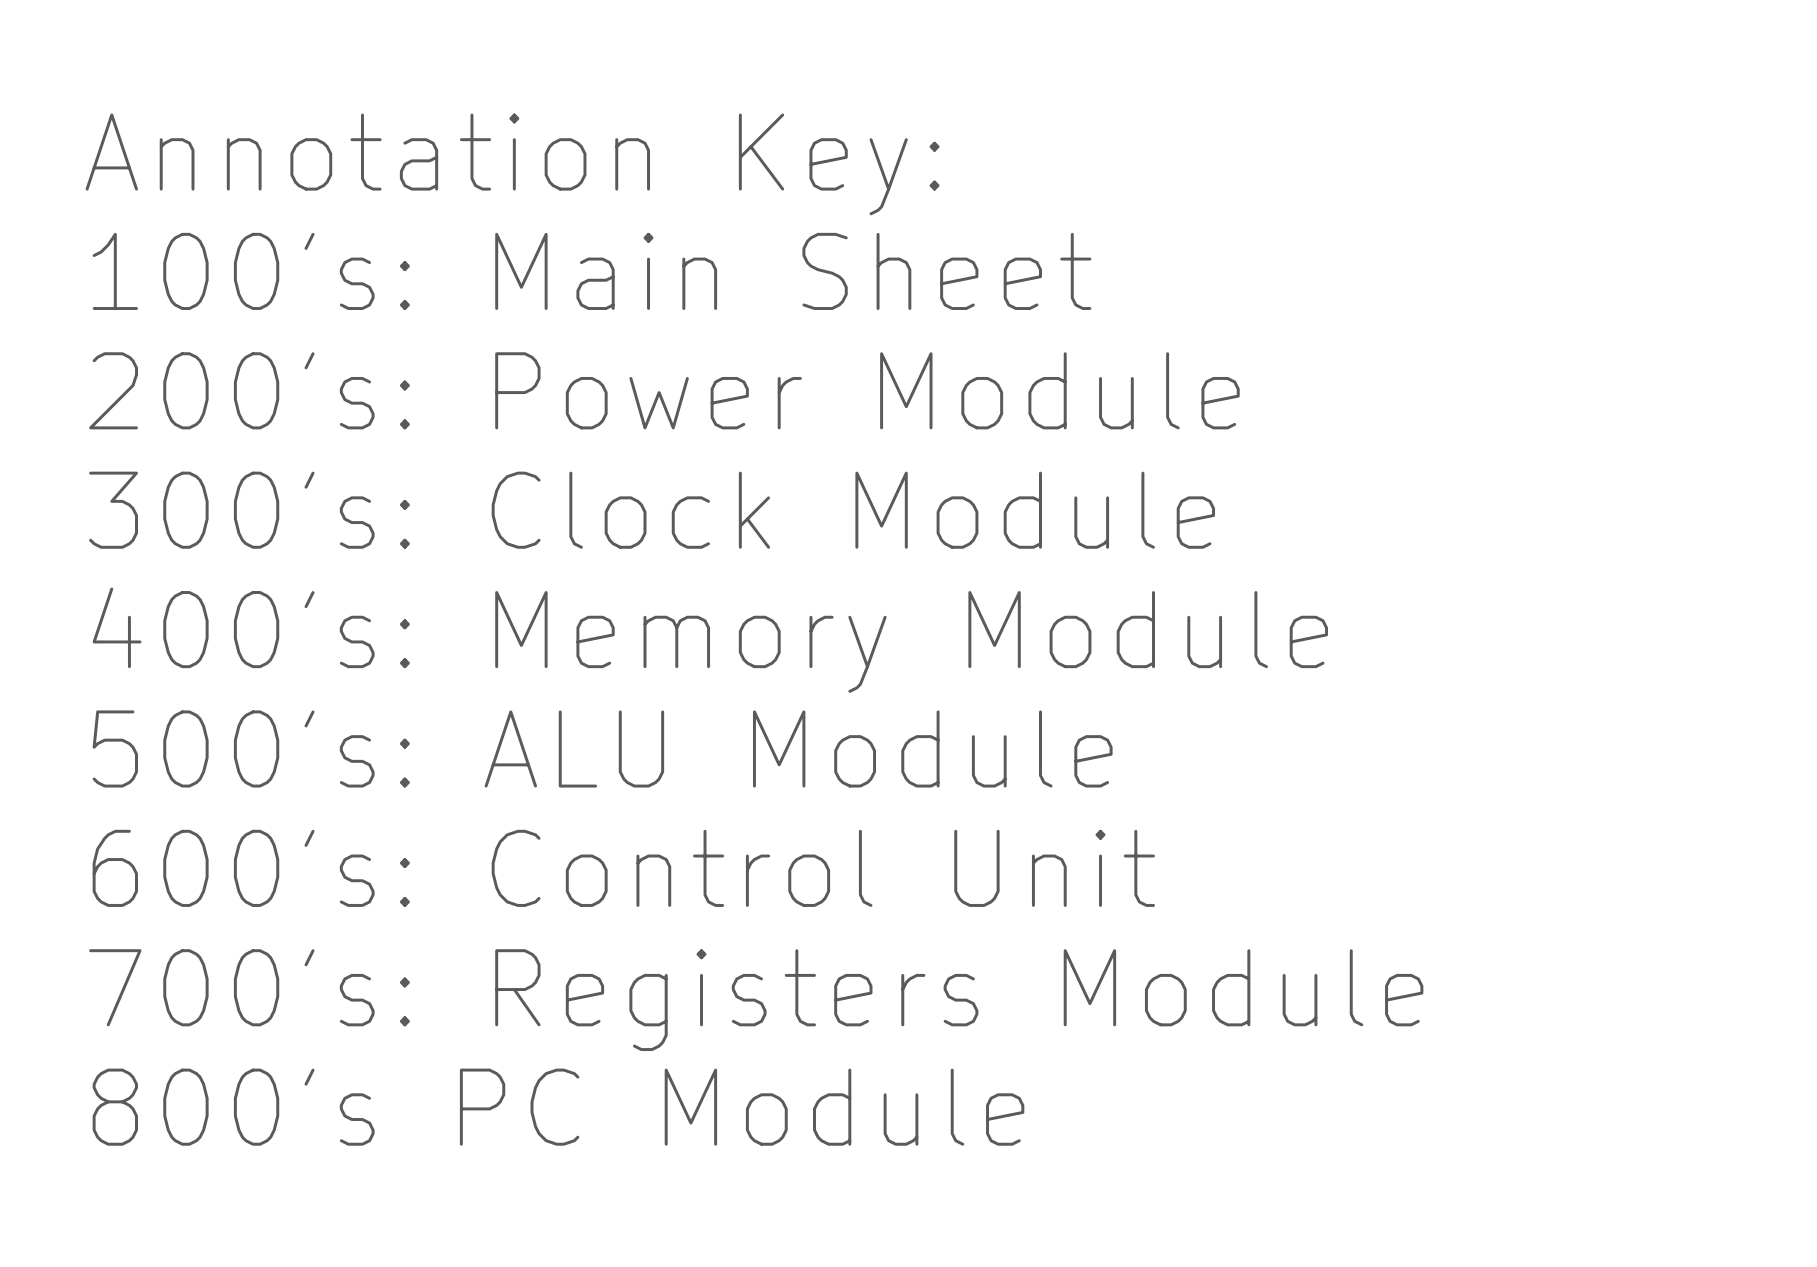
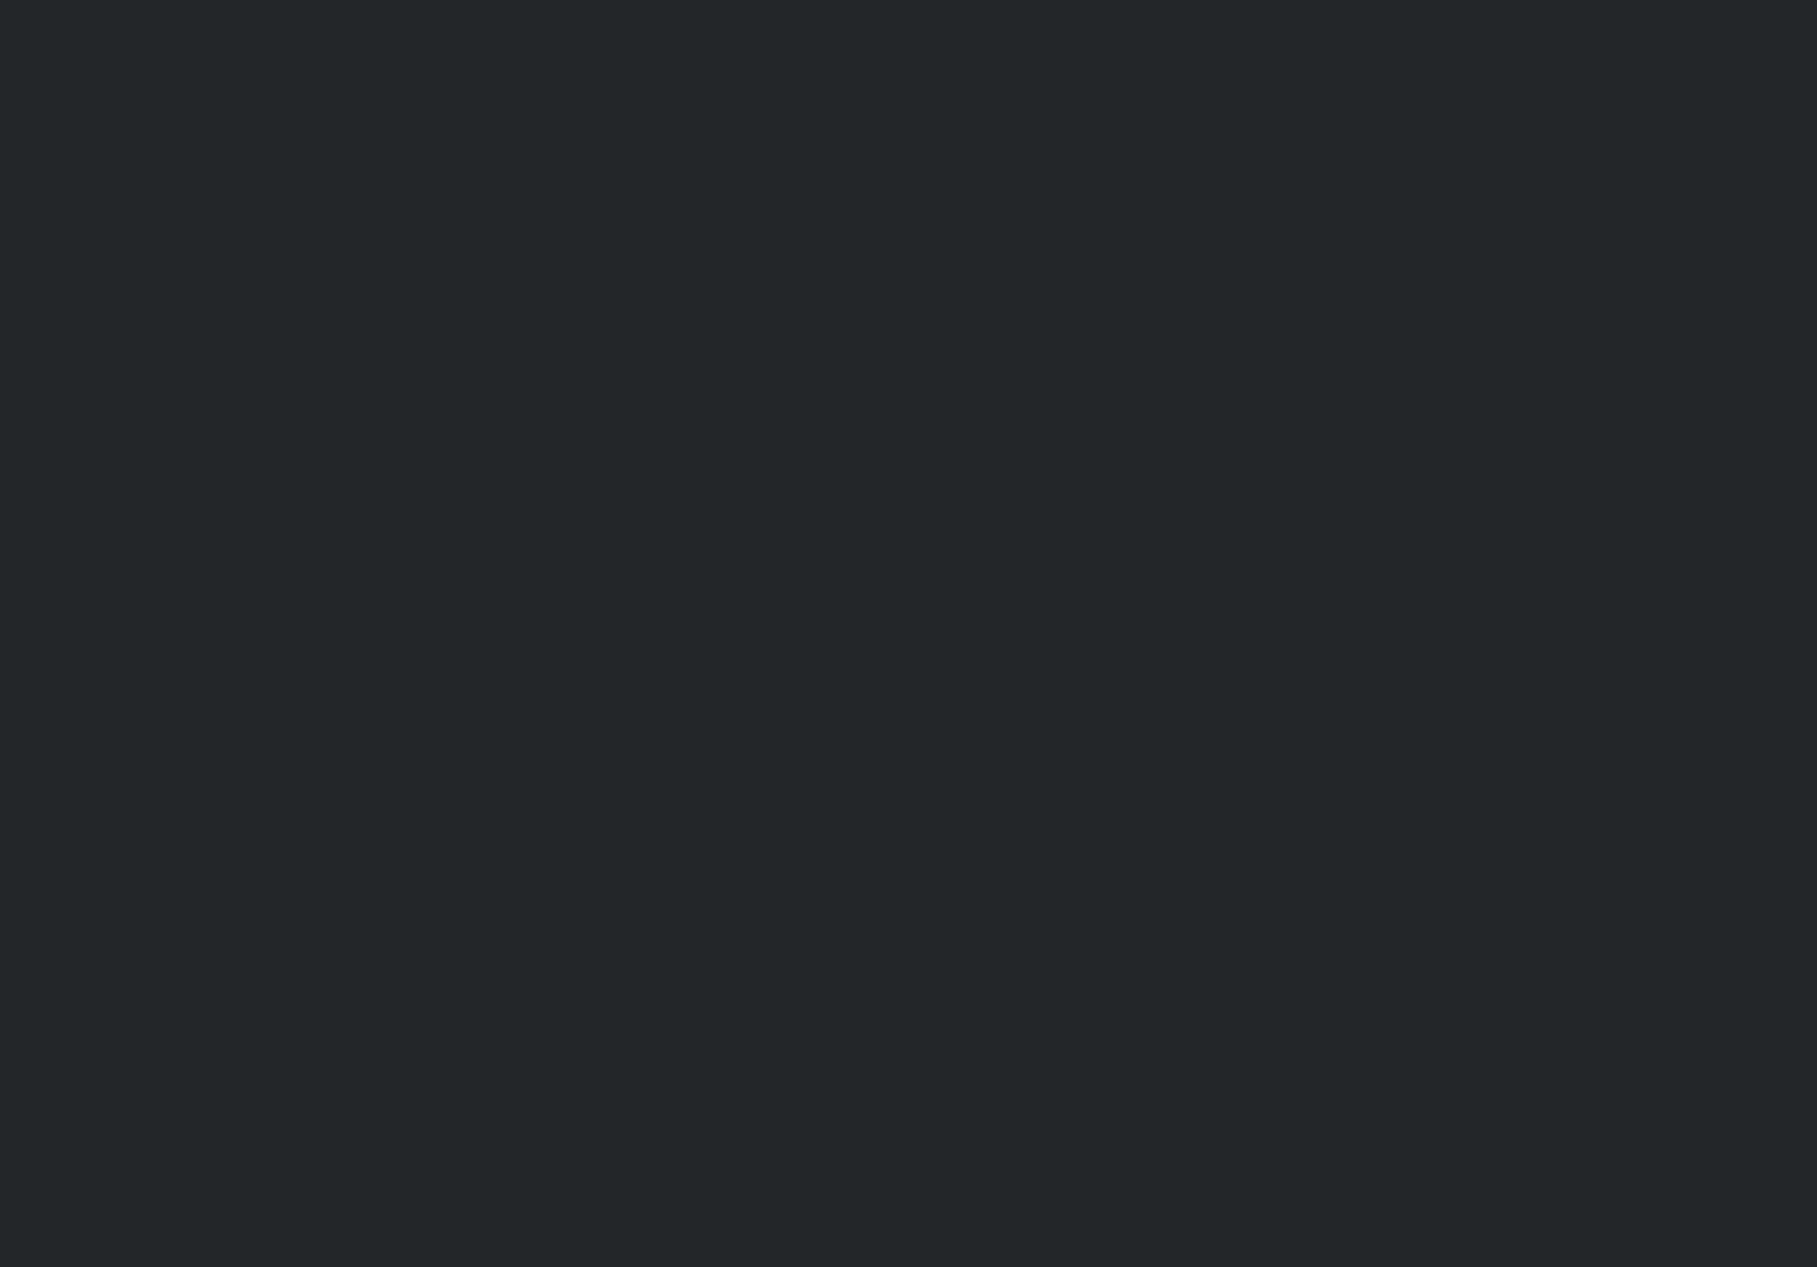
text: Annotation Key: (512, 164) -> none
text: 100's: Main Sheet (592, 271) -> none
text: 200's: Power Module (664, 390) -> none
text: 300's: Clock Module (652, 510) -> none
text: 400's: Memory Module (710, 640) -> none
text: 500's: ALU Module (602, 748) -> none
text: 600's: Control Unit (623, 868) -> none
text: 700's: Registers Module (756, 1000) -> none
text: 800's PC Module (558, 1107) -> none

